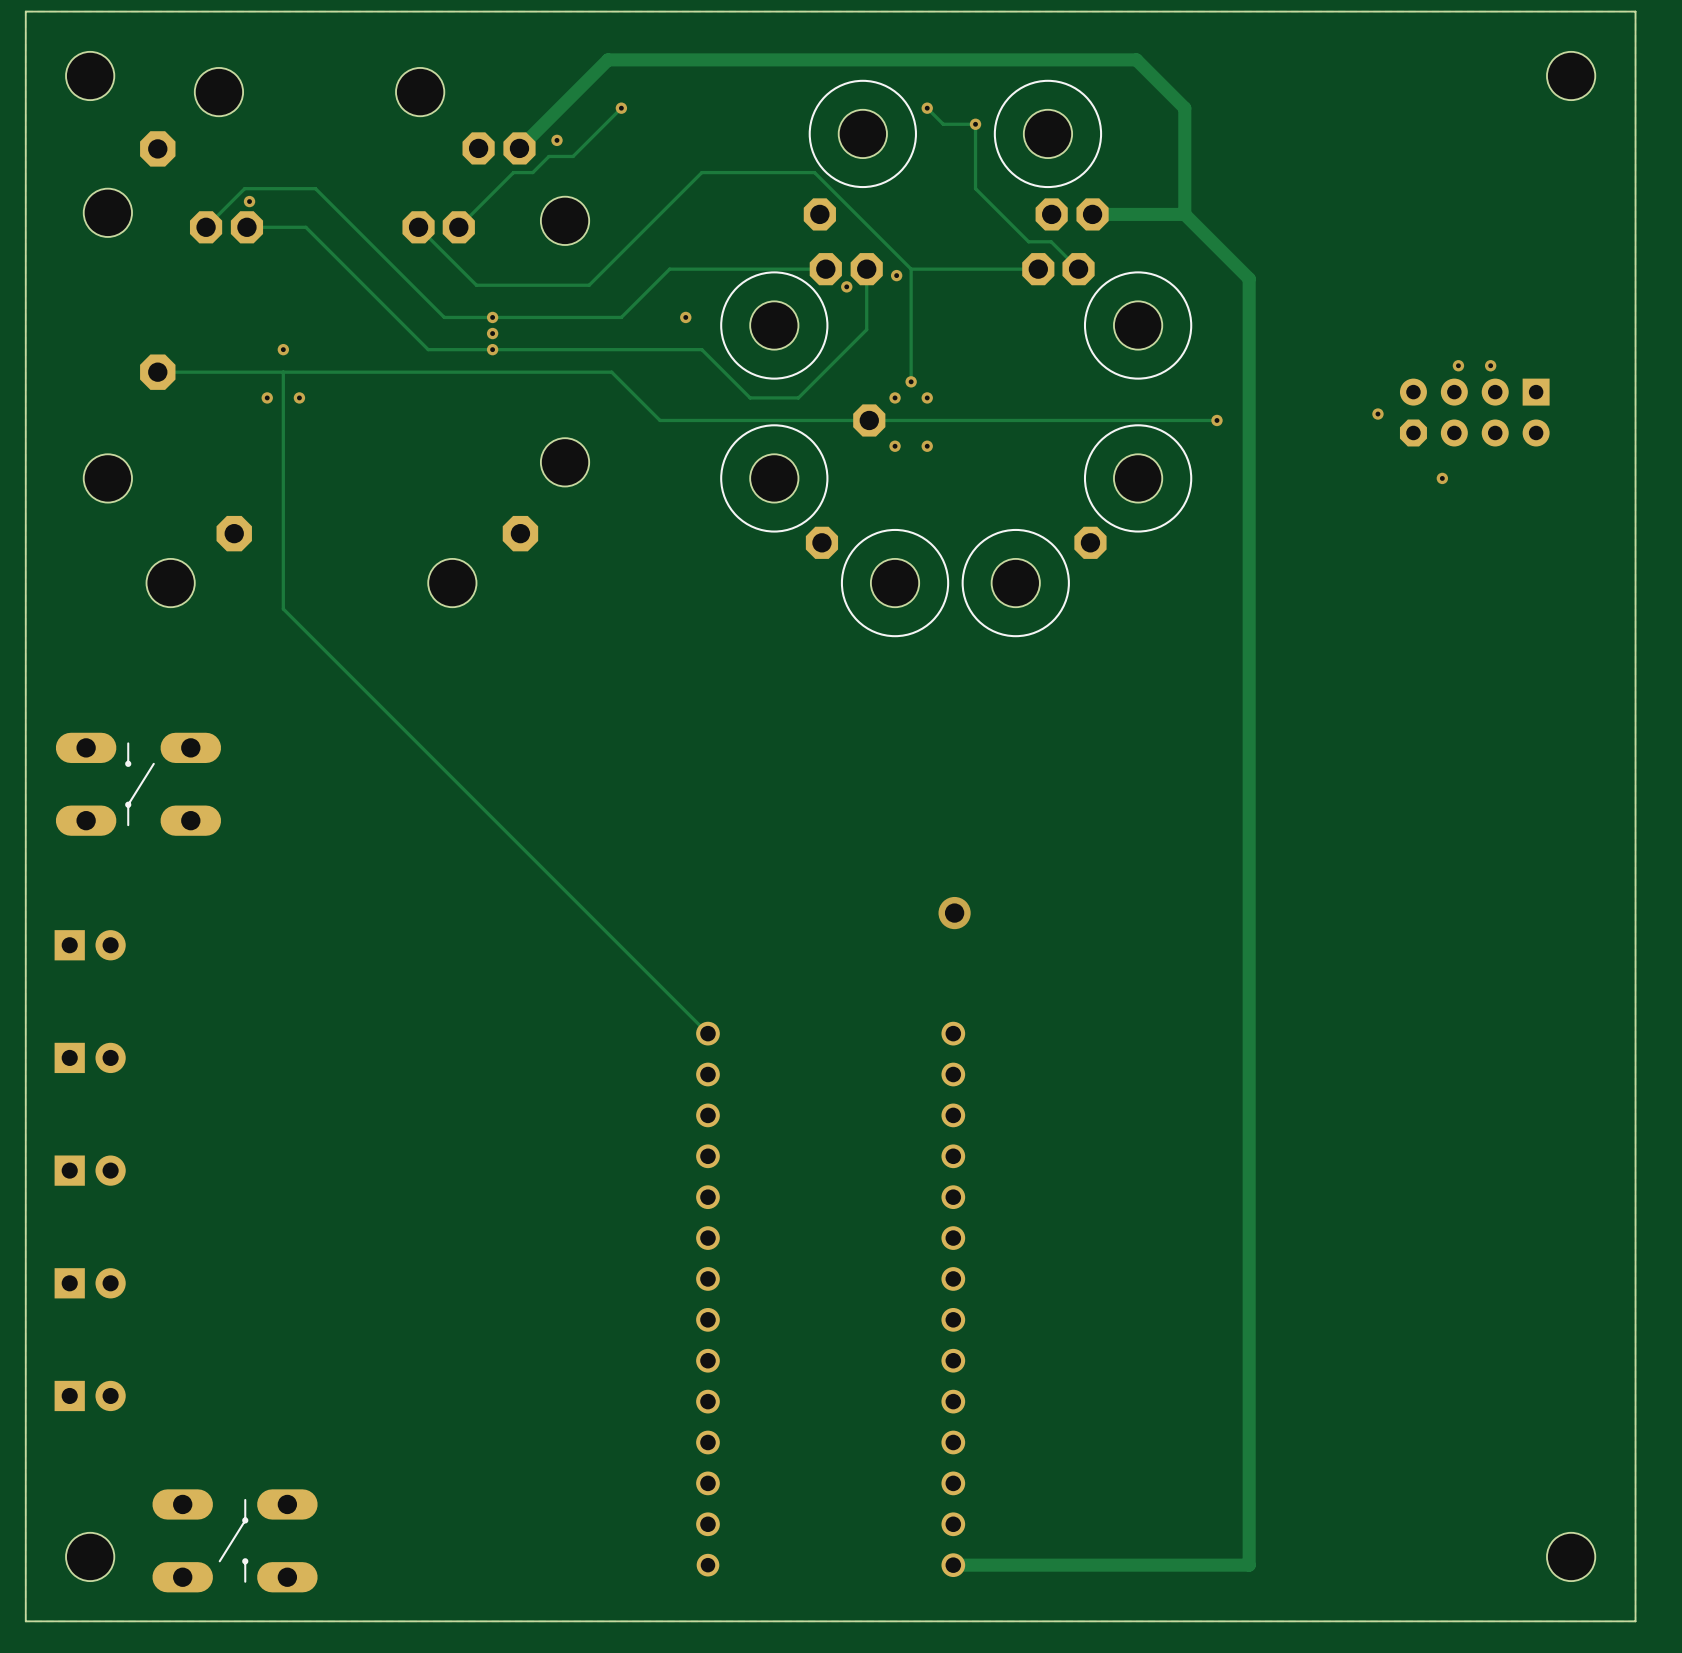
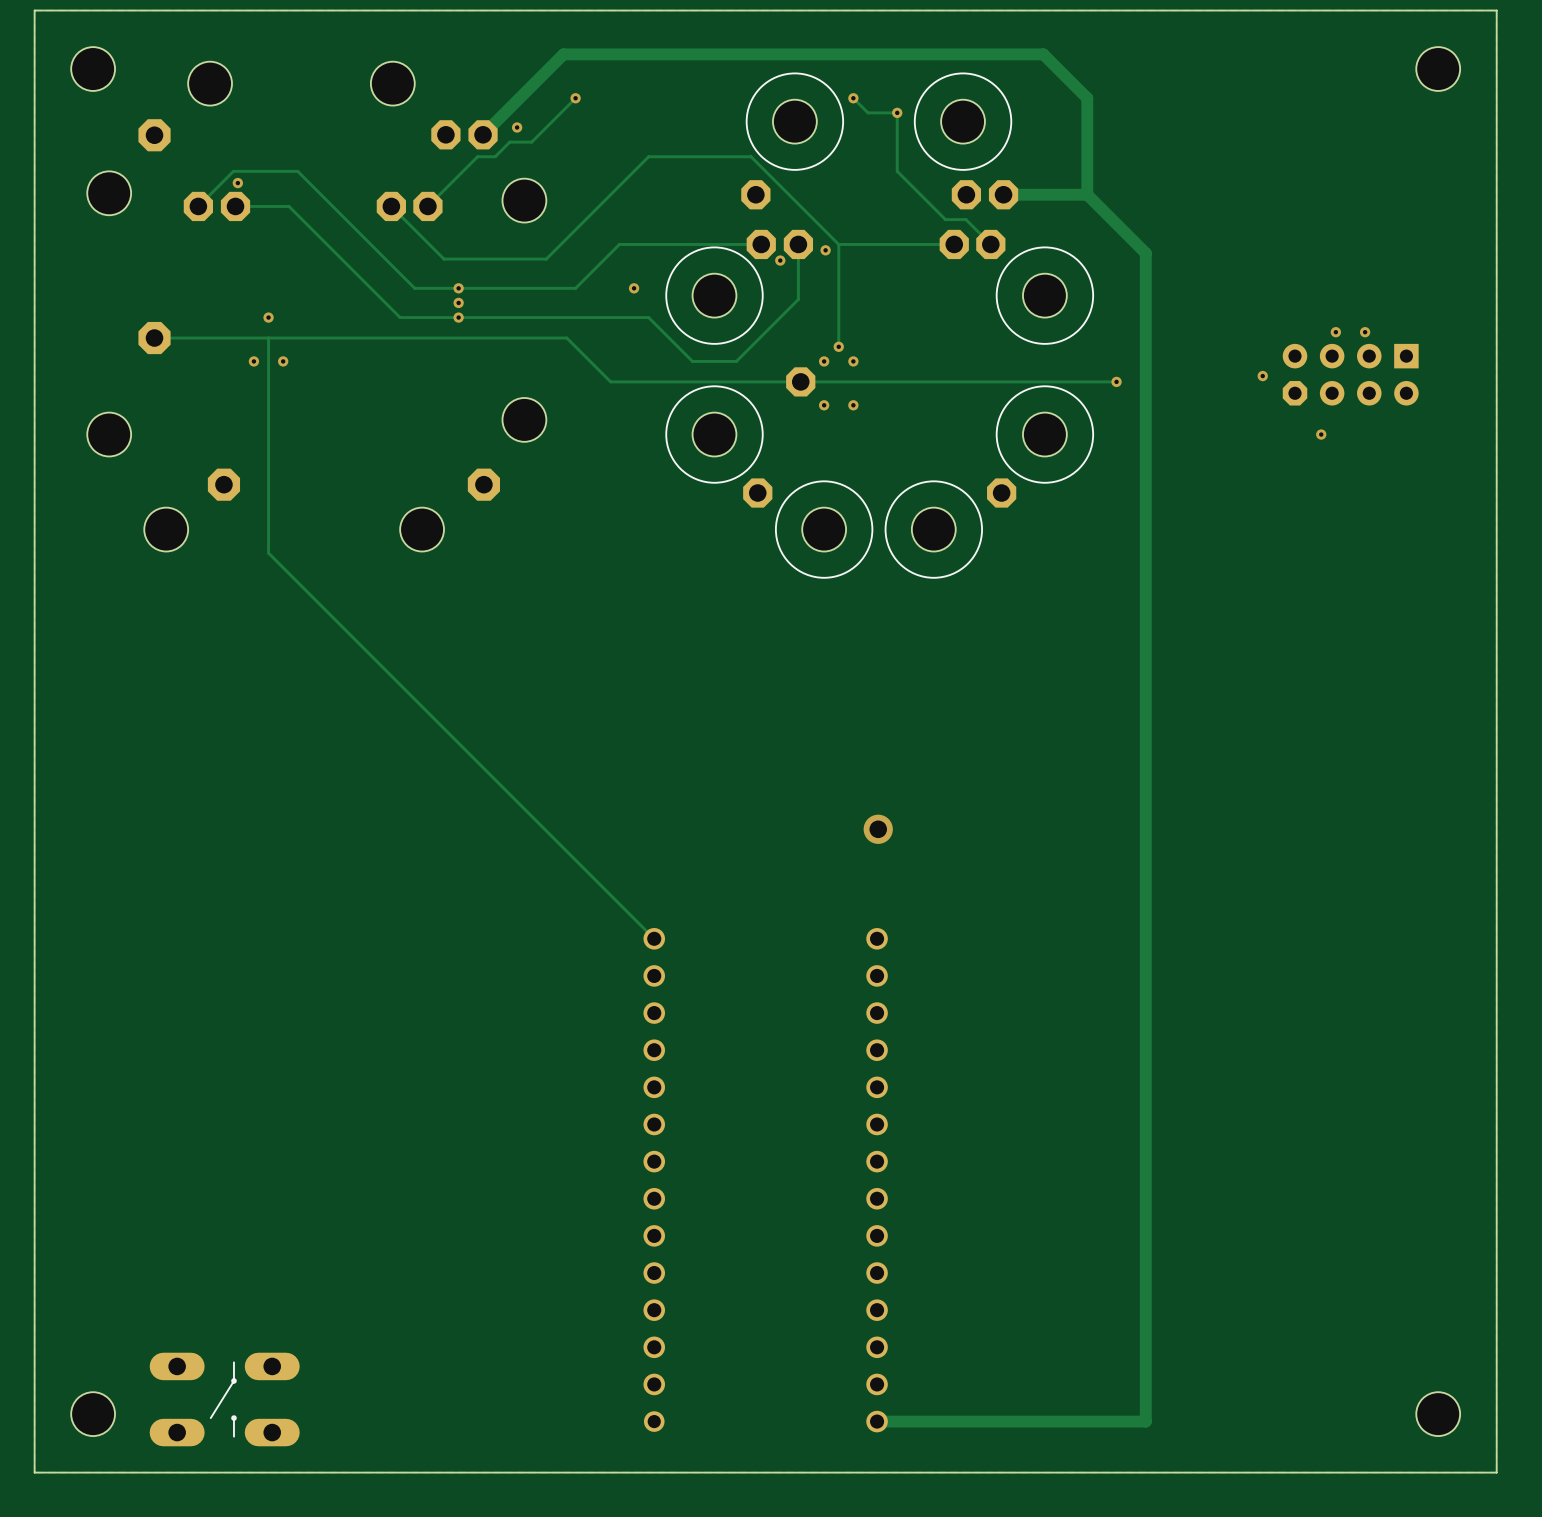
part: (138, 784) -> none
part: (90, 945) -> none
part: (90, 1057) -> none
part: (90, 1170) -> none
part: (90, 1283) -> none
part: (90, 1395) -> none

